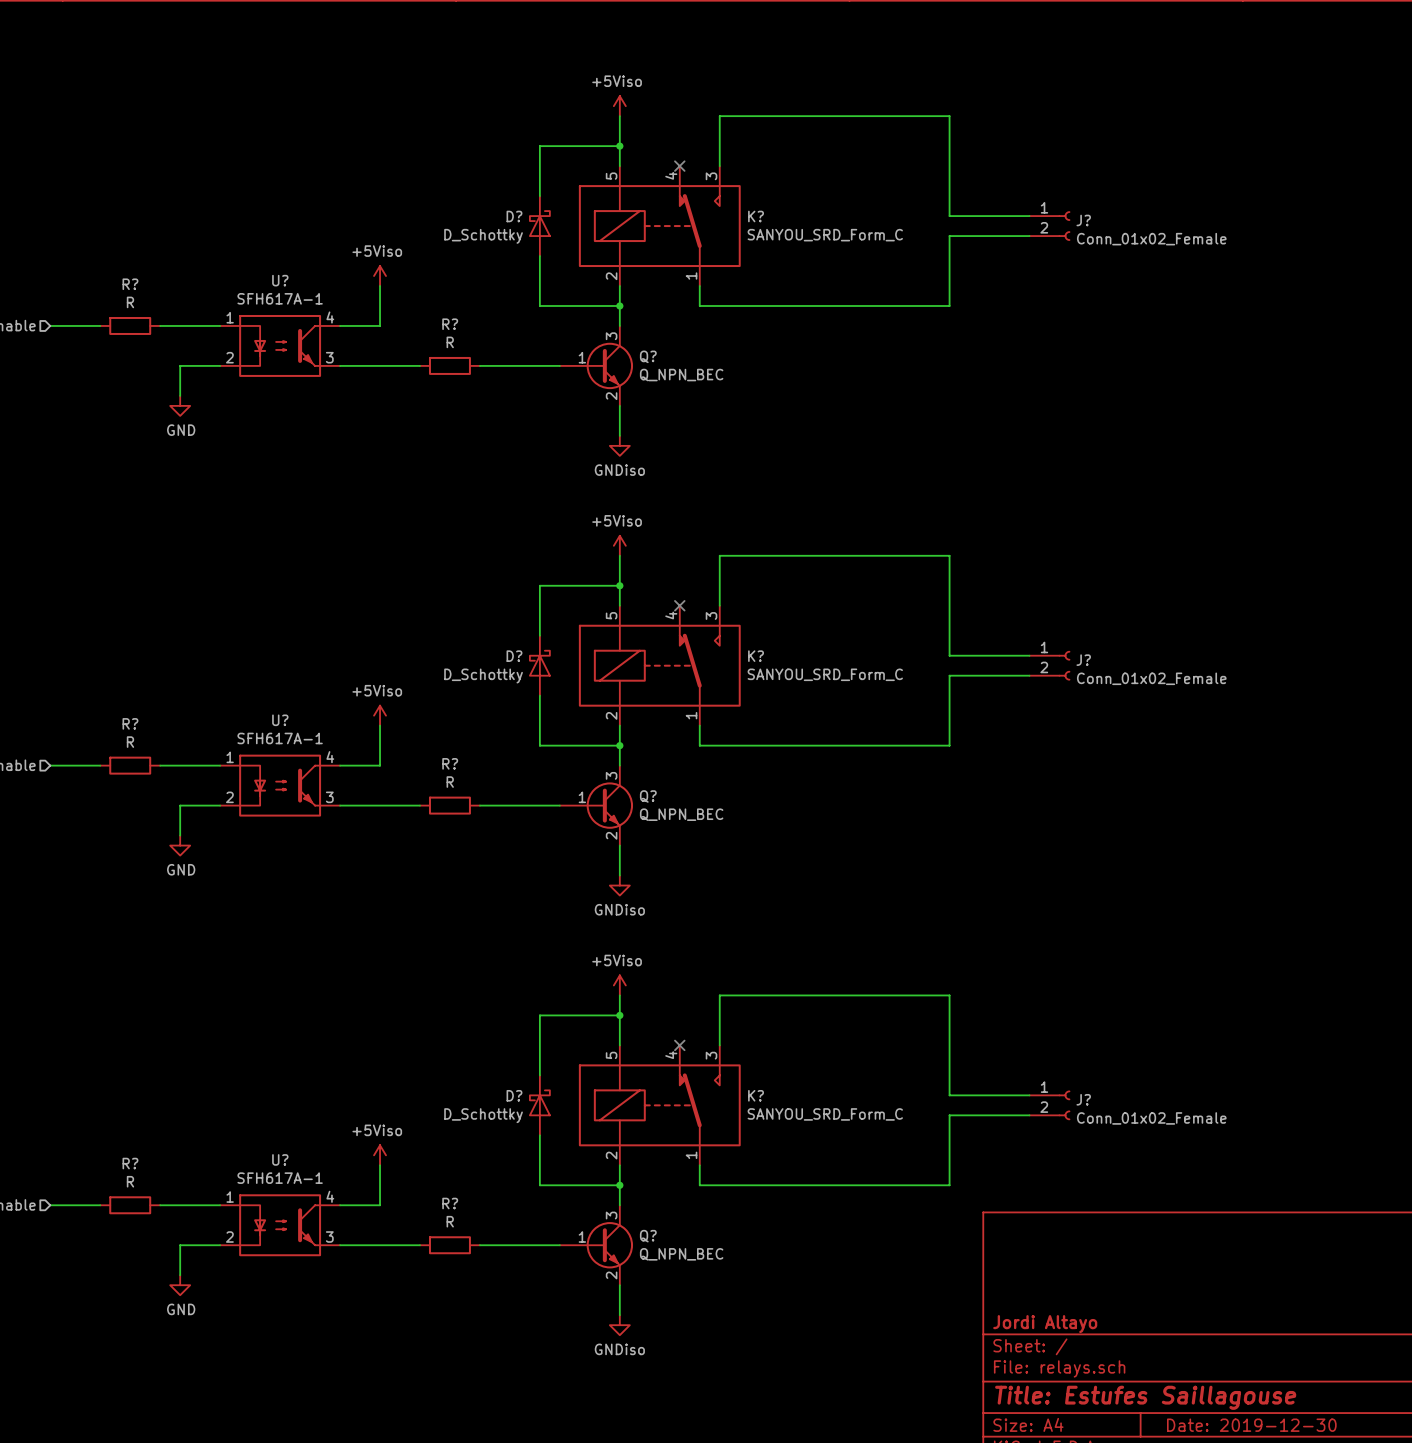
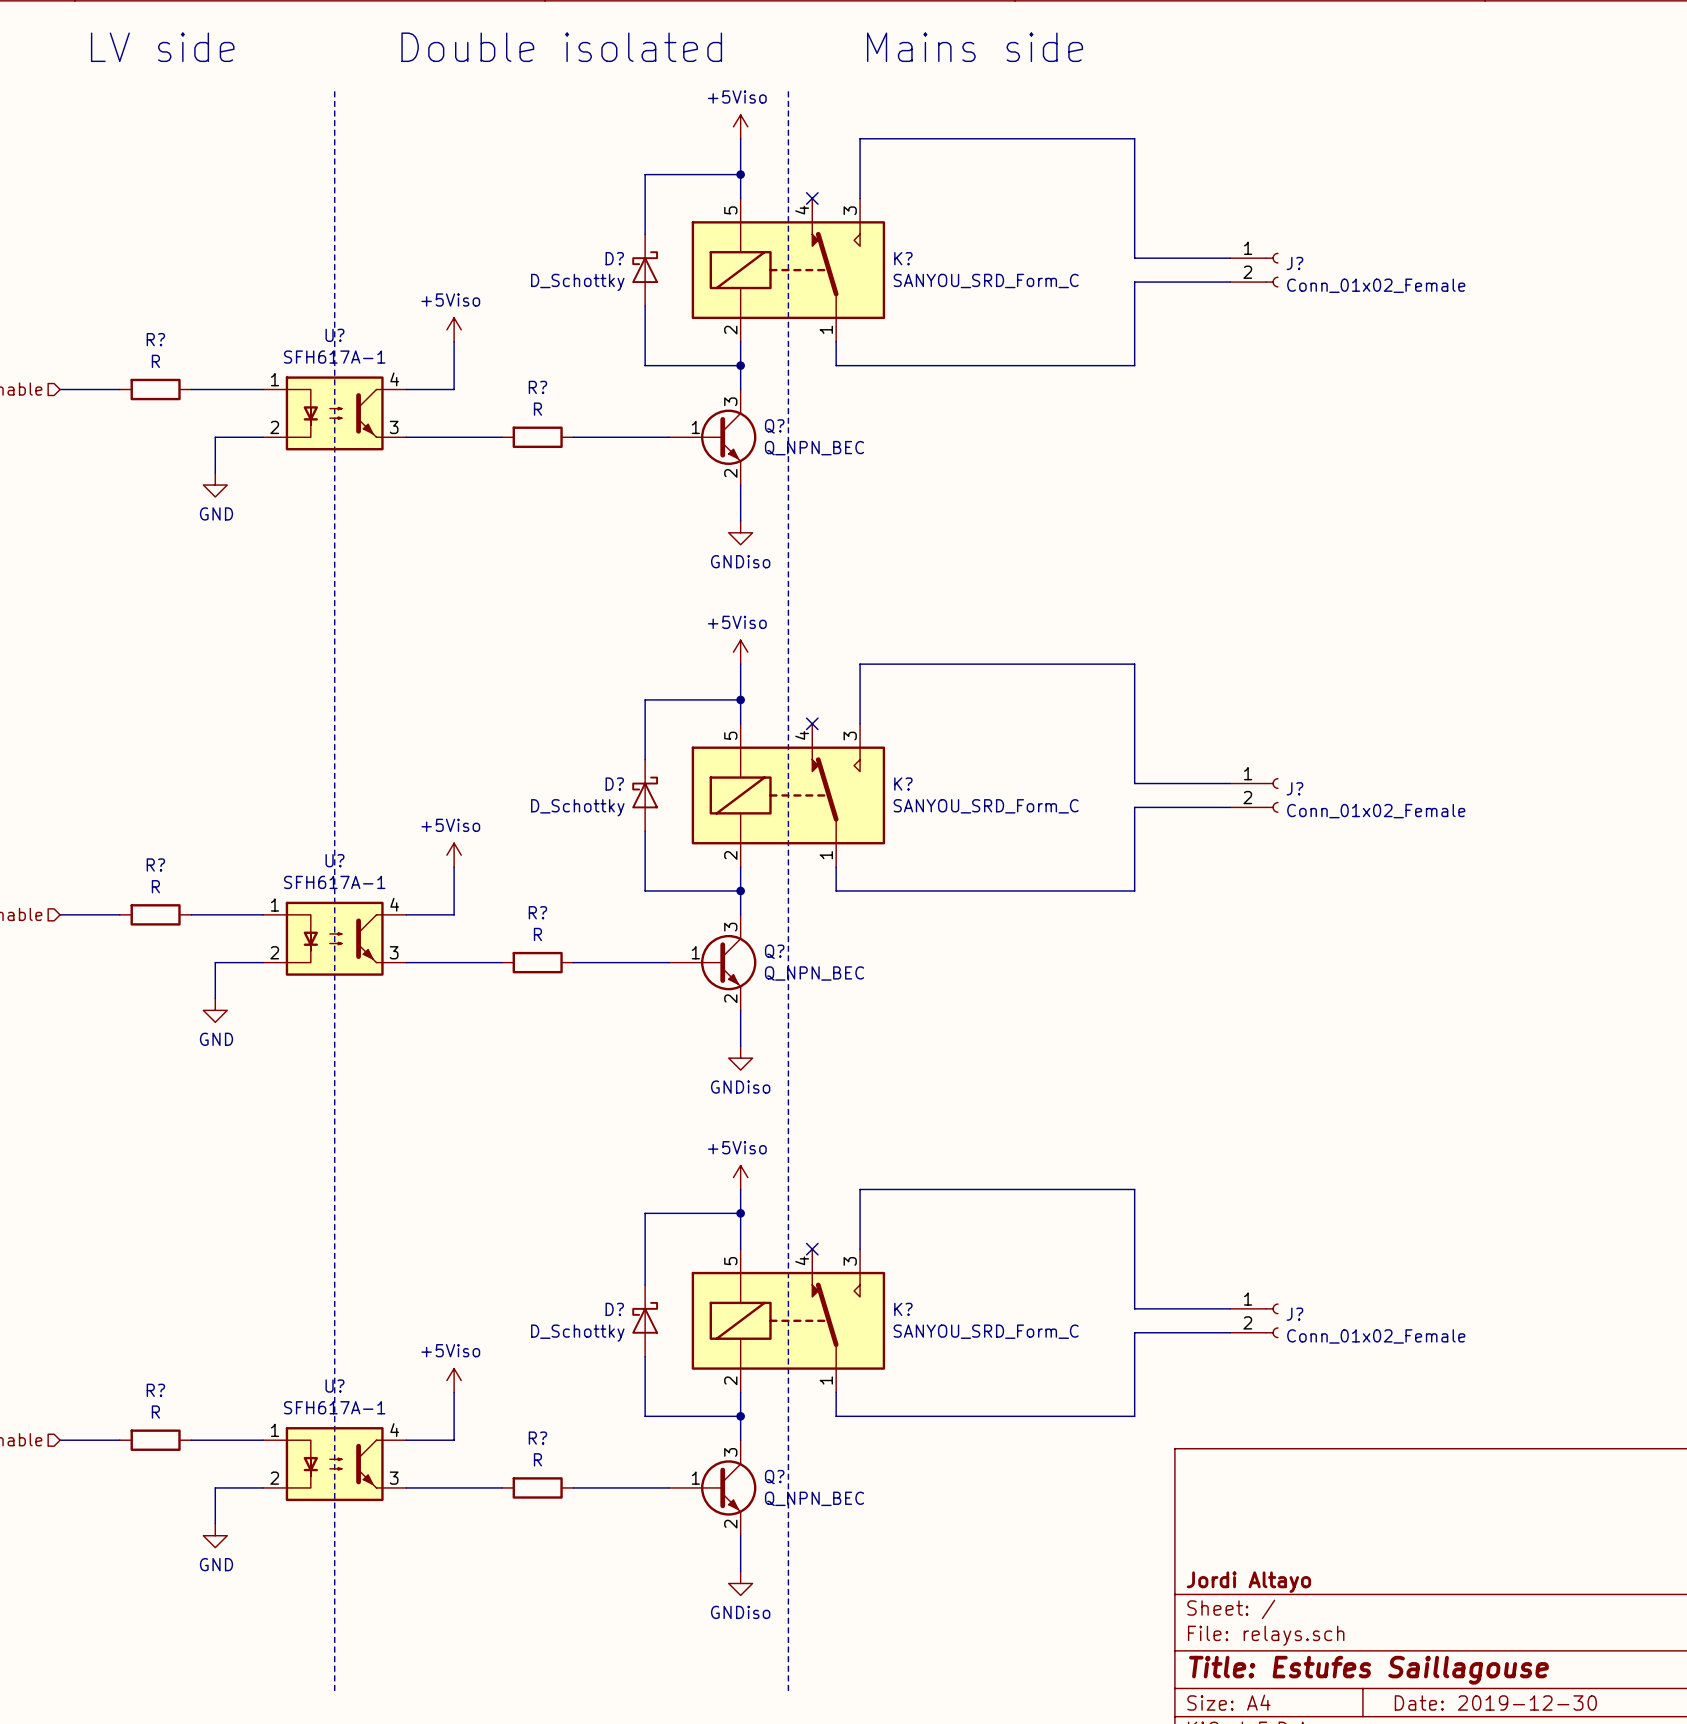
text: none -> LV side (162, 47)
text: none -> Double isolated (561, 47)
text: none -> Mains side (975, 47)
line: none -> (334, 91) (334, 1690)
line: none -> (788, 91) (788, 1690)

